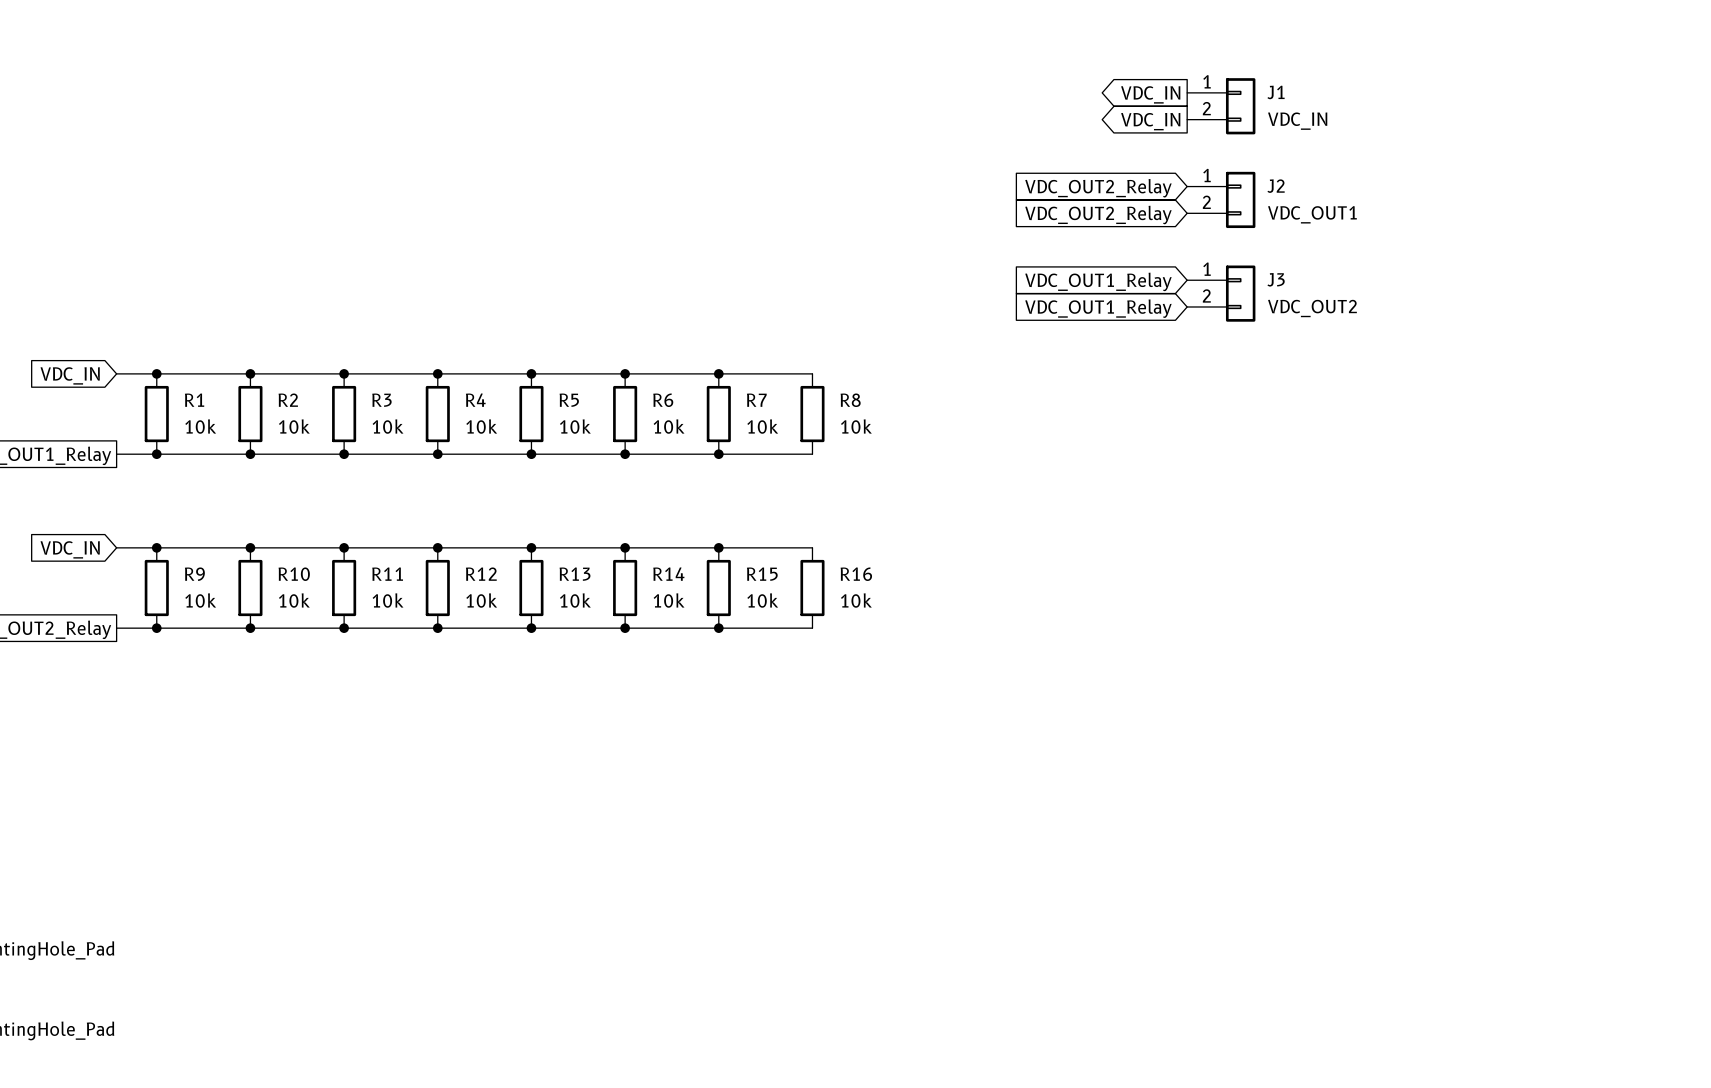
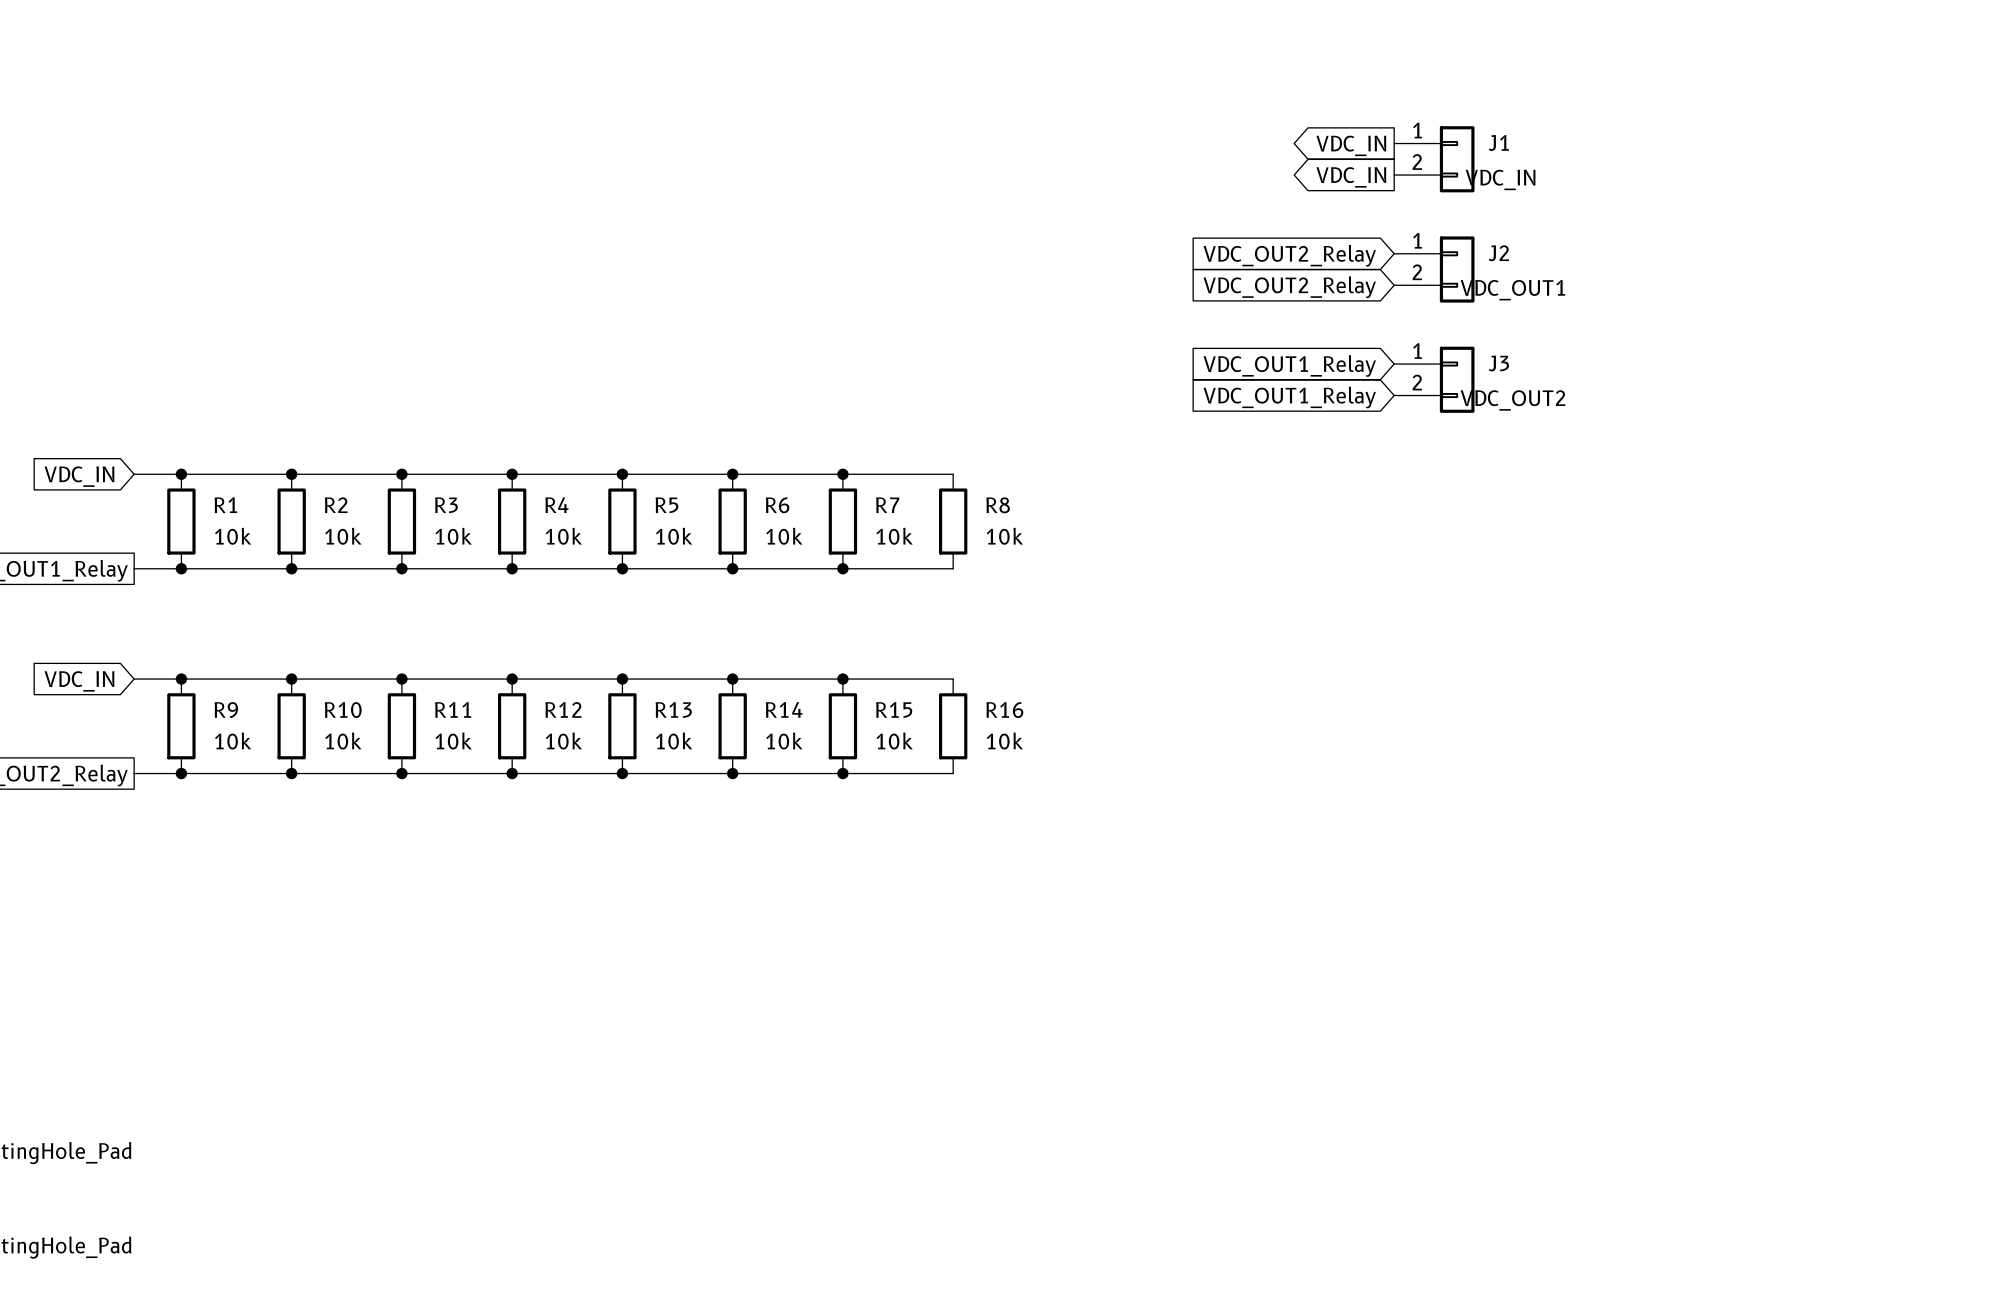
J1 value: VDC_IN (1297, 121) -> none
J1 text: none -> VDC_IN (1500, 179)
J2 value: VDC_OUT1 (1312, 214) -> none
J2 text: none -> VDC_OUT1 (1512, 290)
J3 value: VDC_OUT2 (1312, 308) -> none
J3 text: none -> VDC_OUT2 (1512, 400)

